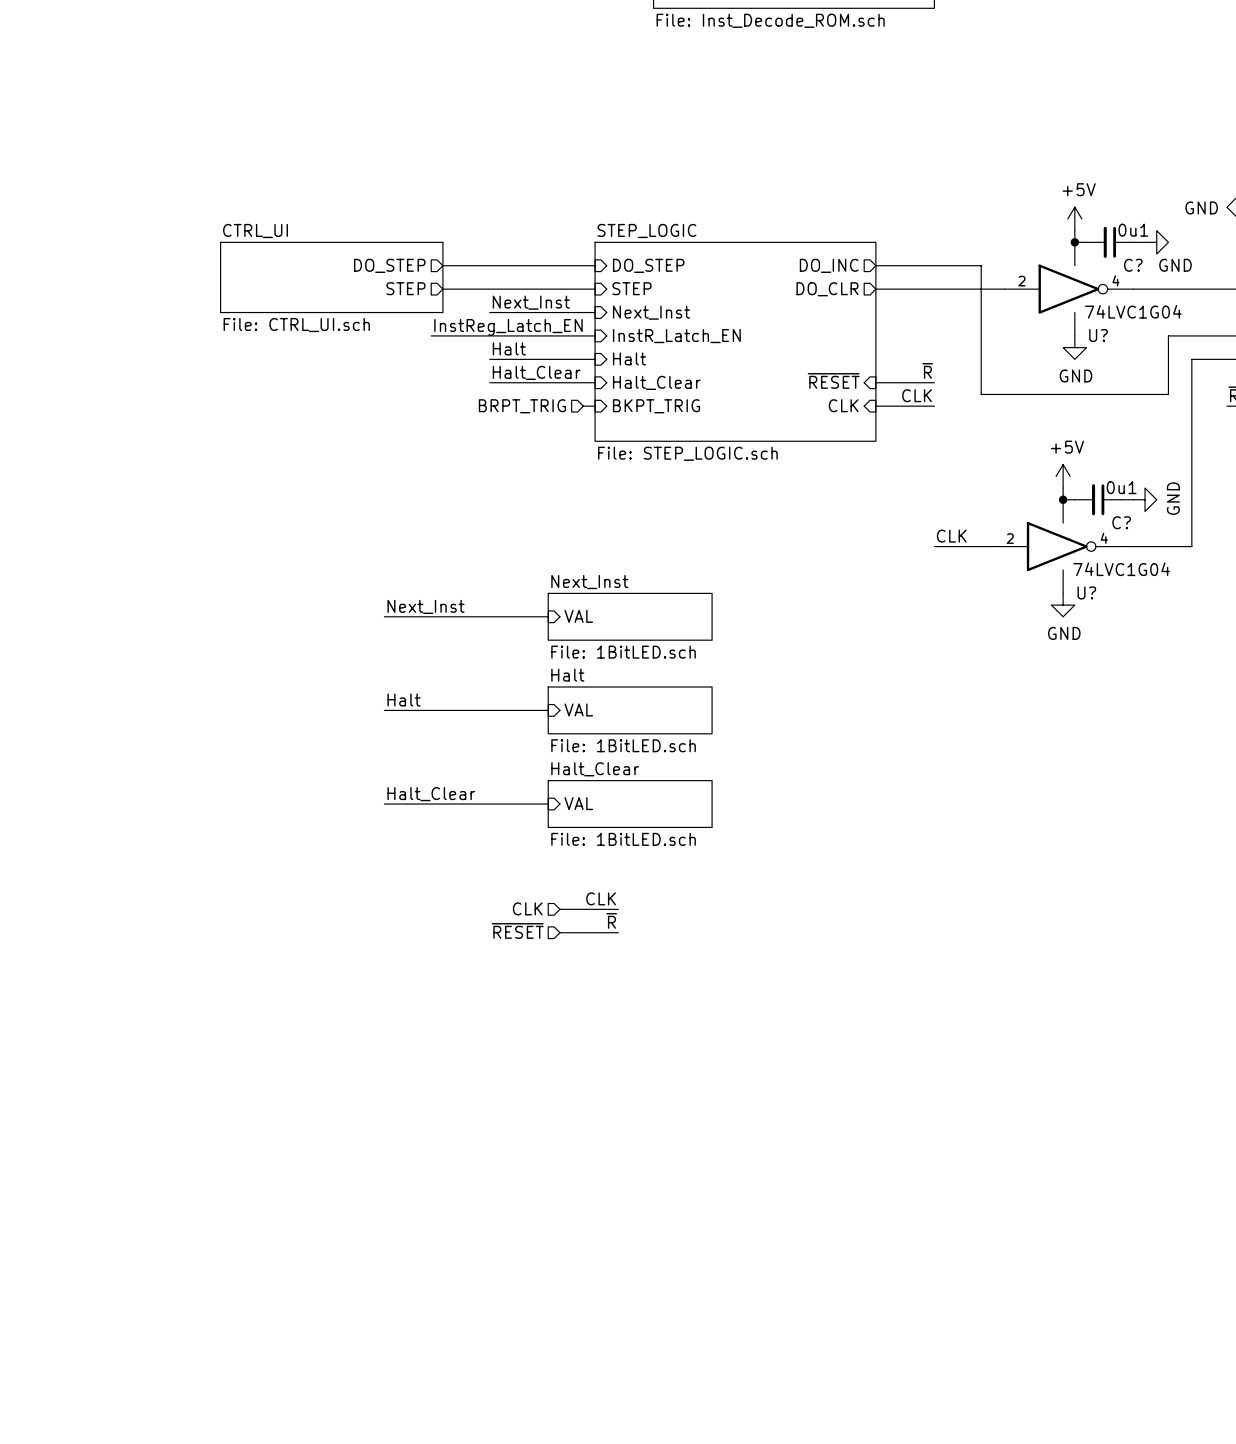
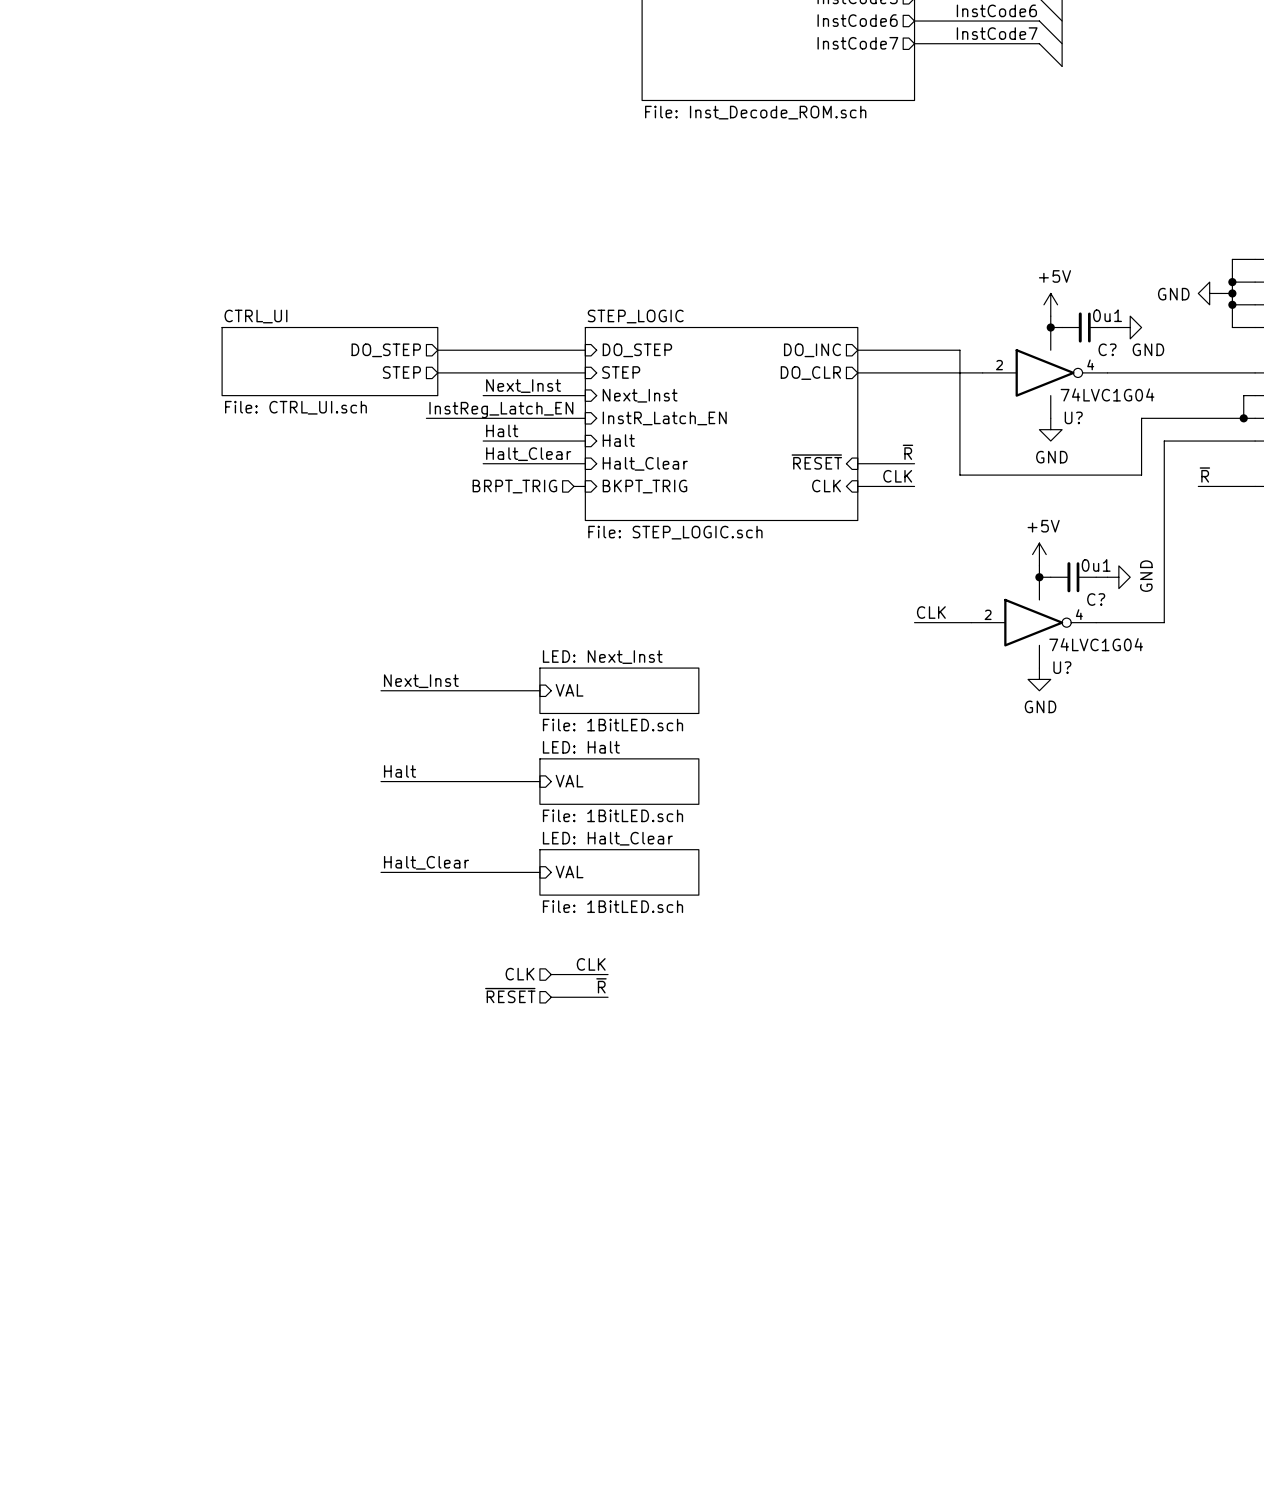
sheet Next_Inst name: Next_Inst (589, 582) -> LED: Next_Inst (602, 657)
sheet Halt name: Halt (567, 675) -> LED: Halt (581, 747)
sheet Halt_Clear name: Halt_Clear (595, 769) -> LED: Halt_Clear (607, 838)

